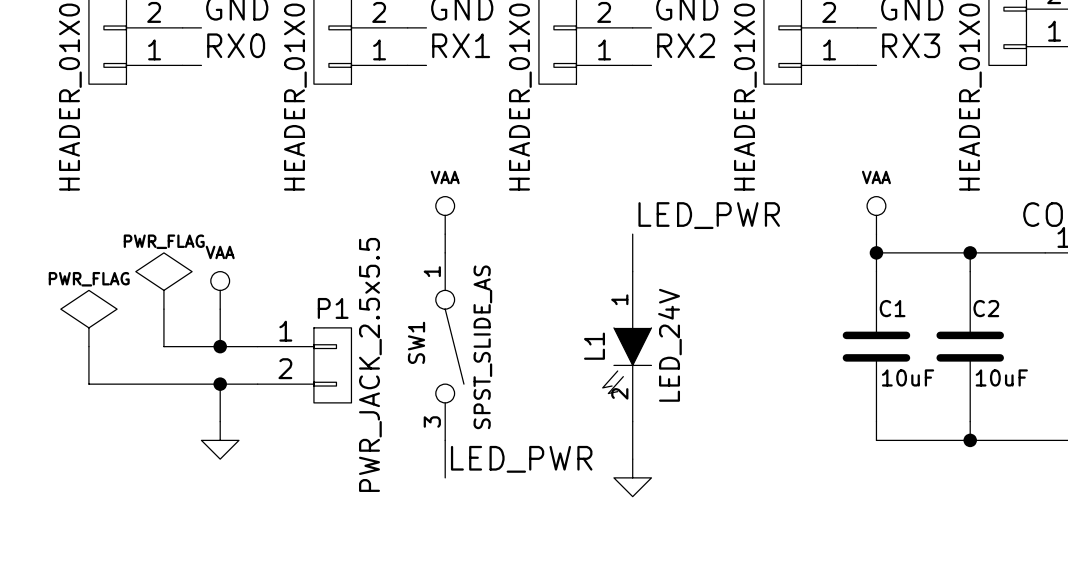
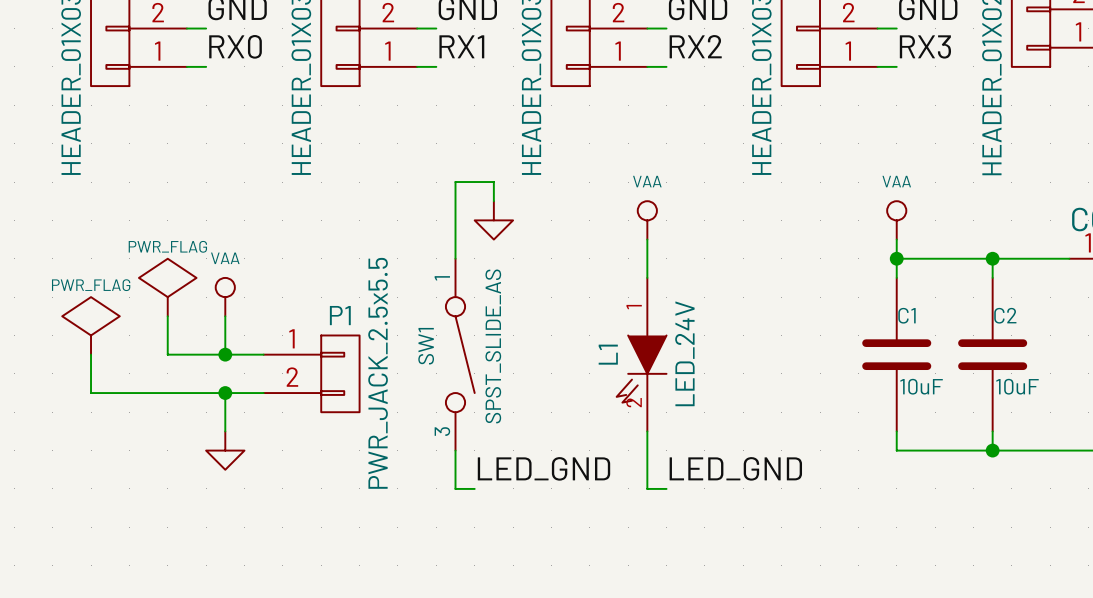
wire: none -> (493, 201) (493, 182) (455, 182) (455, 239)
power symbol position: VAA (445, 215) -> VAA (647, 220)
label: LED_PWR (709, 215) -> none
label: LED_PWR (521, 459) -> none
label: none -> LED_GND (543, 468)
label: none -> LED_GND (735, 468)
wire: none -> (455, 488) (474, 488)
power symbol position: (632, 477) -> (493, 220)

